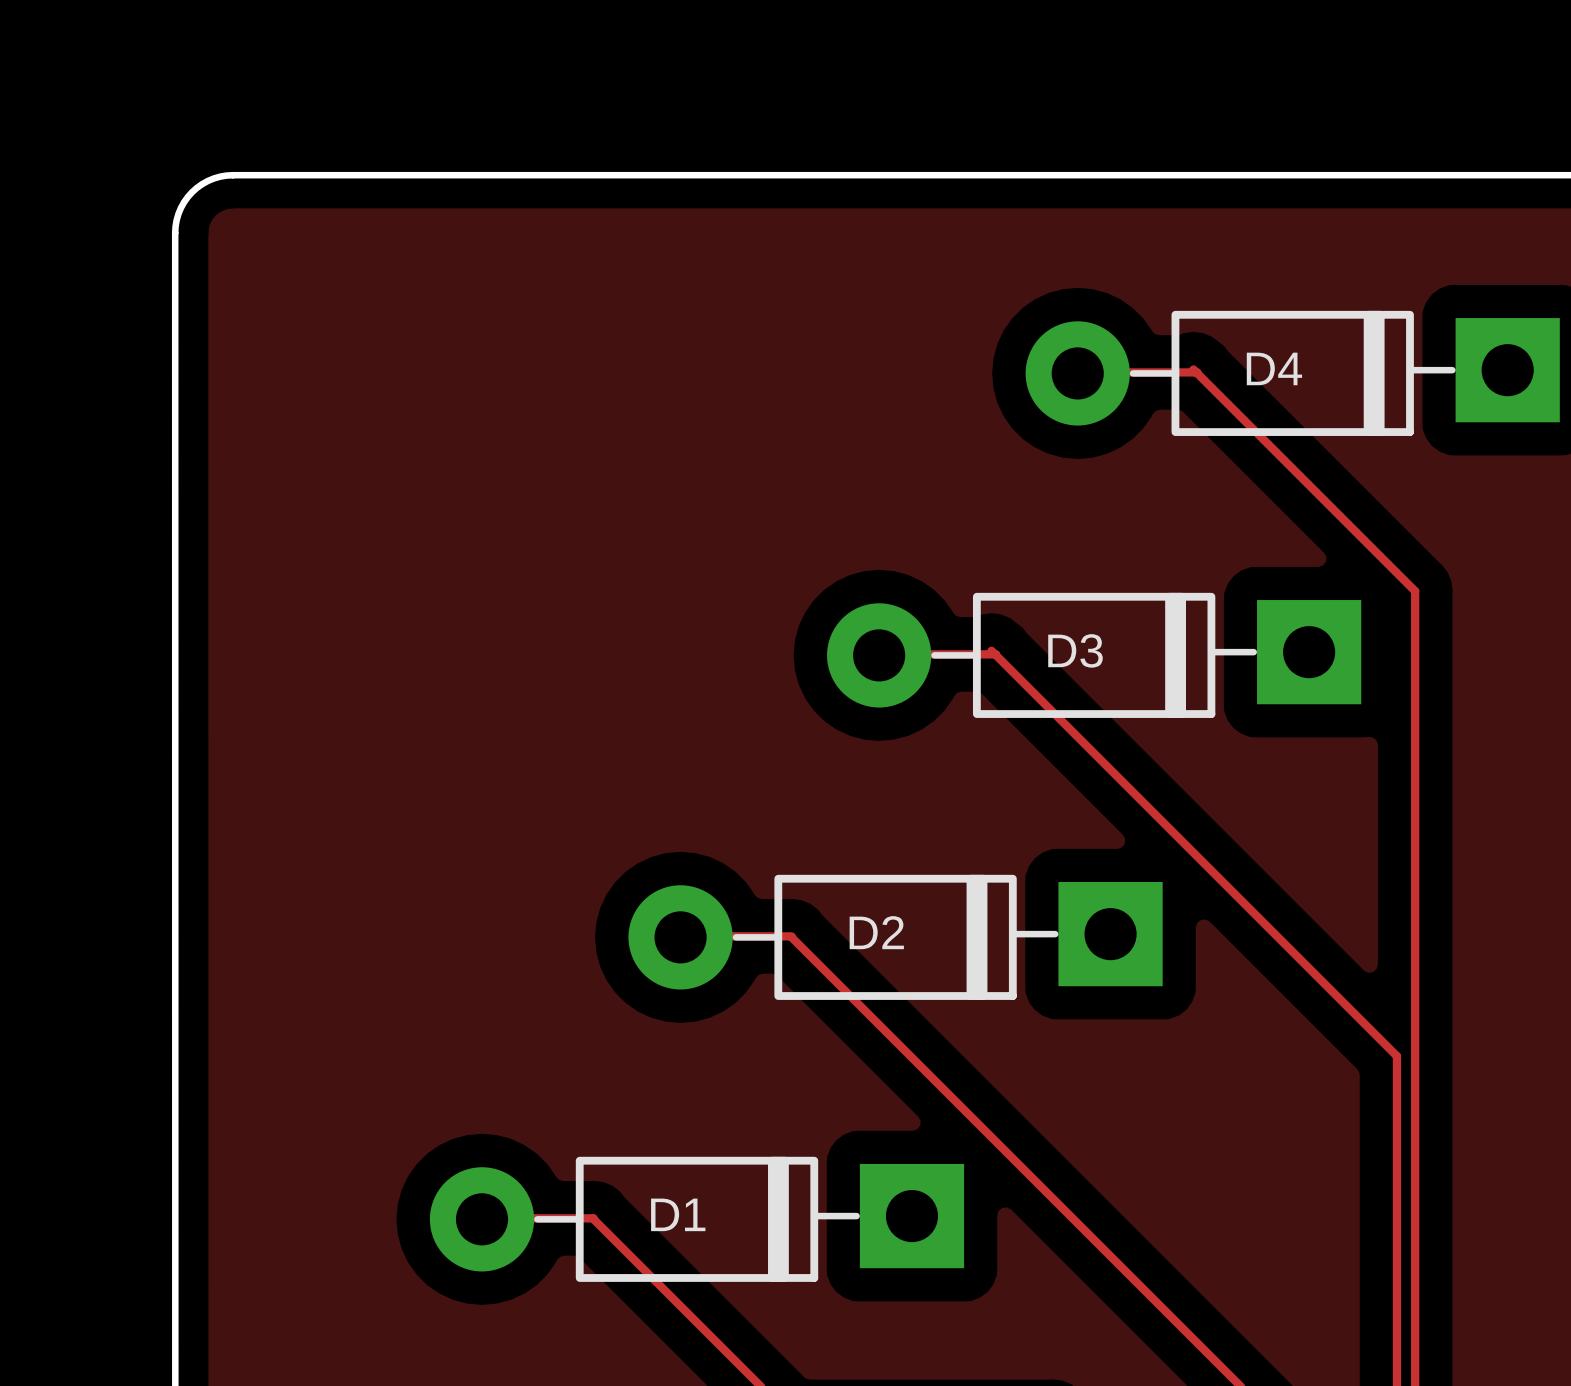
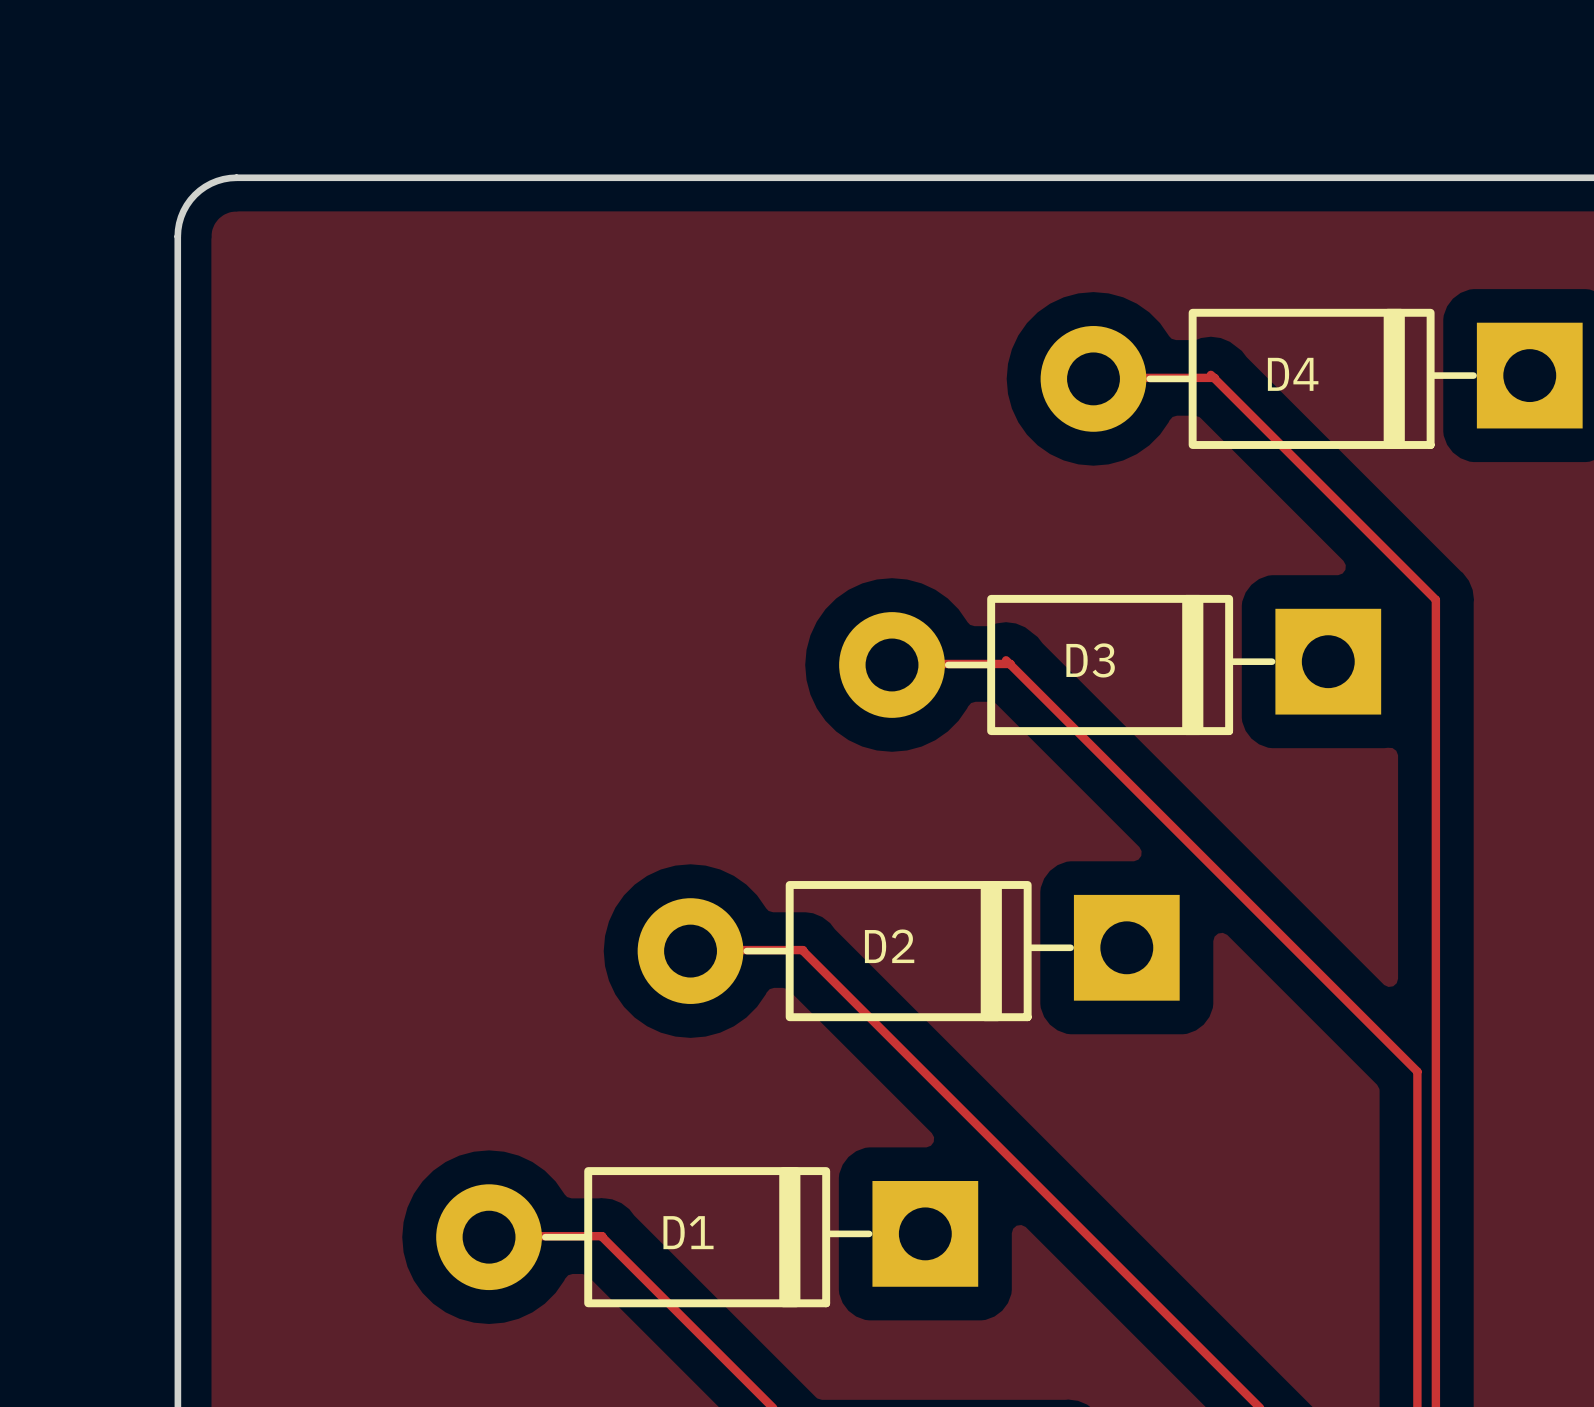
D4 footprint: [1025, 310, 1560, 436] -> [1040, 308, 1583, 449]
D3 footprint: [827, 592, 1362, 718] -> [839, 594, 1382, 736]
D2 footprint: [628, 874, 1163, 1000] -> [637, 881, 1180, 1022]
D1 footprint: [429, 1156, 965, 1282] -> [436, 1167, 979, 1308]

